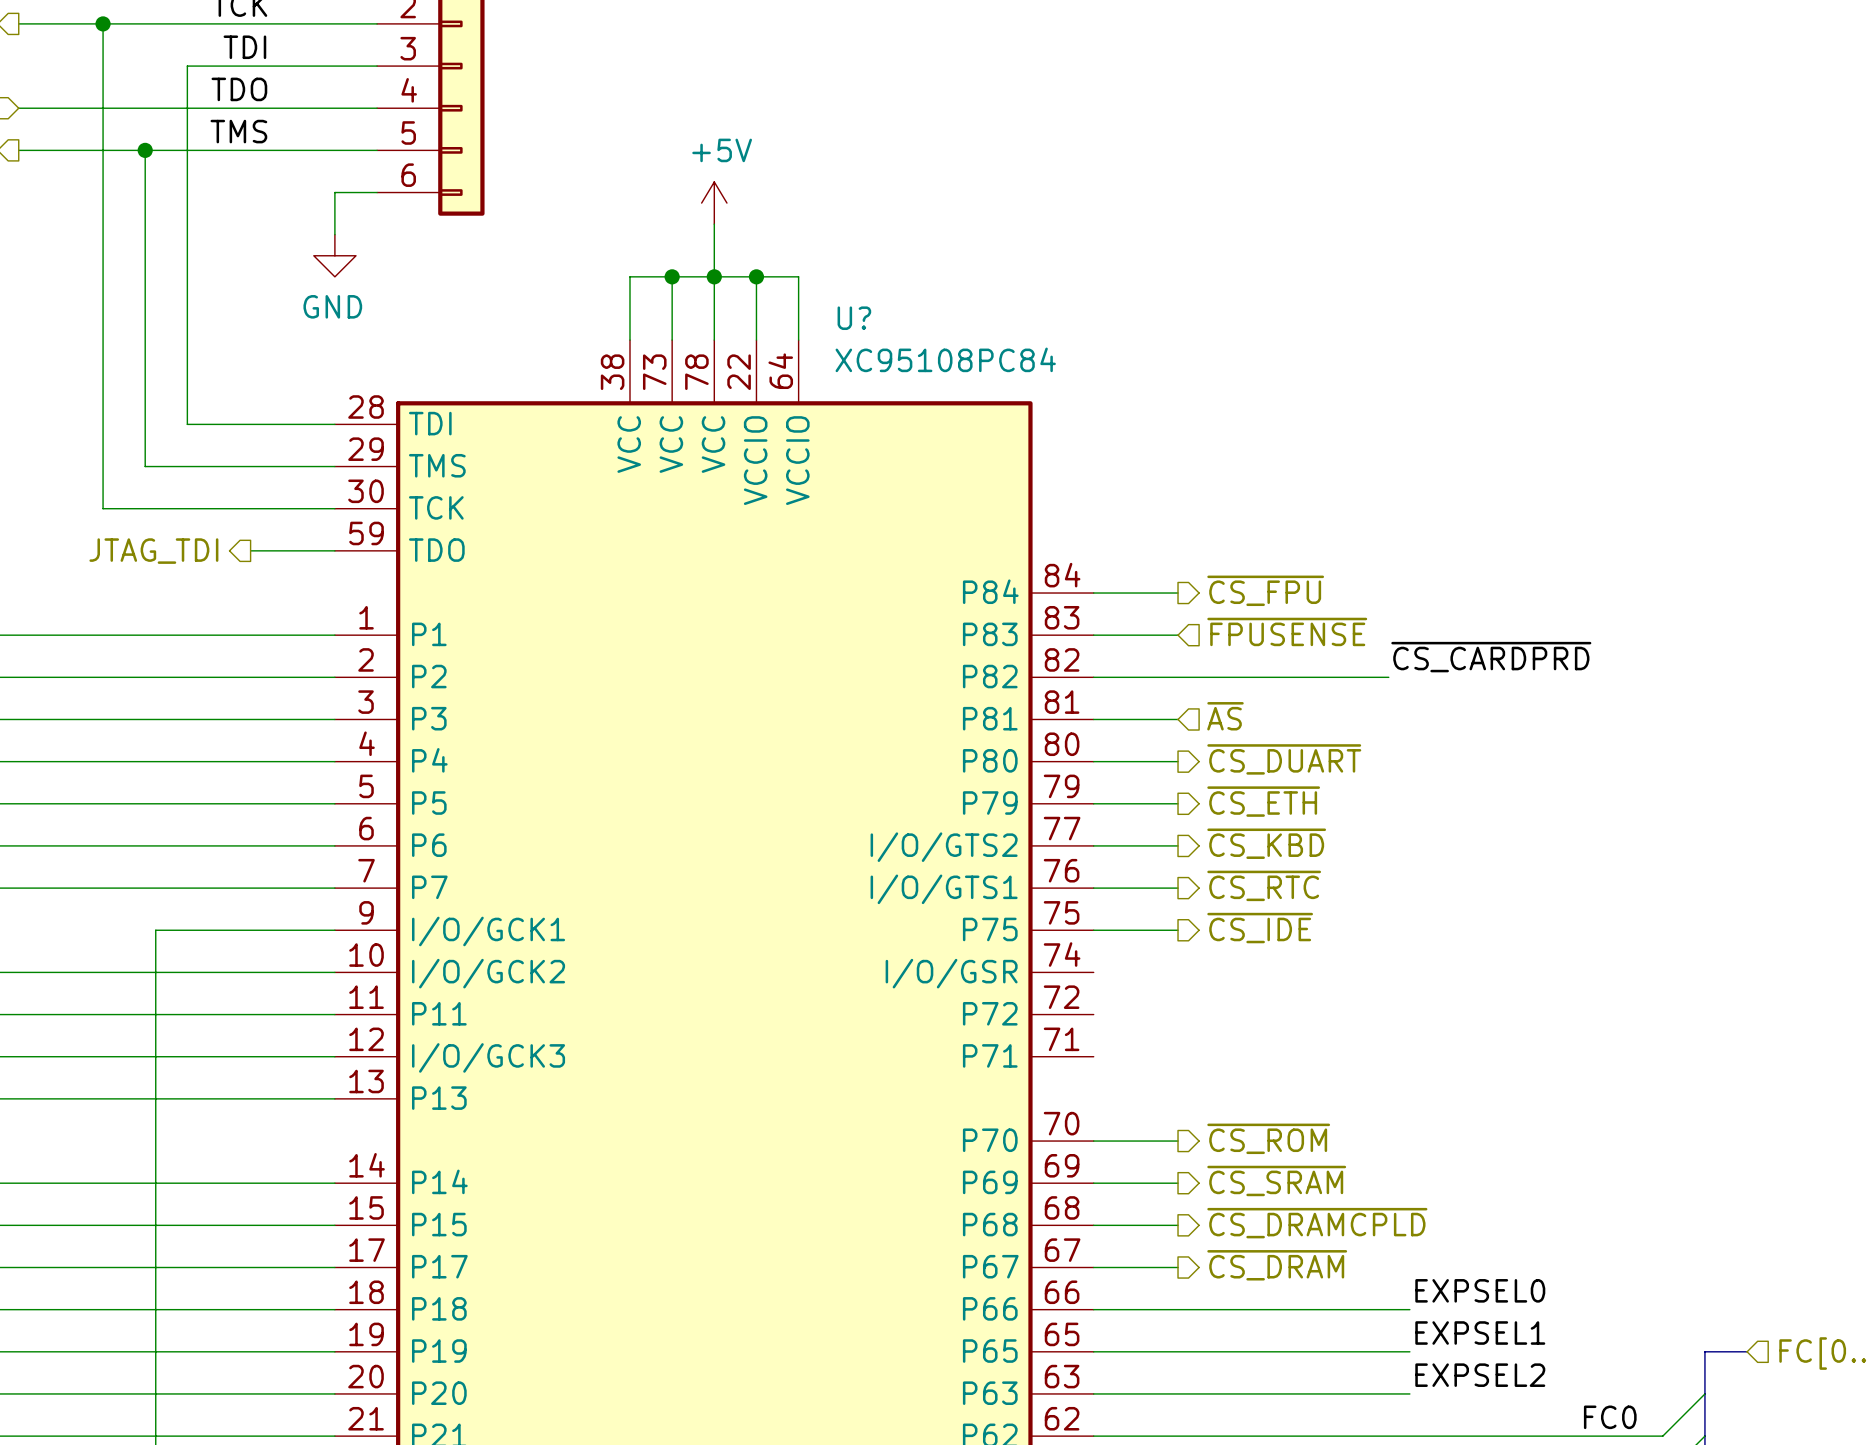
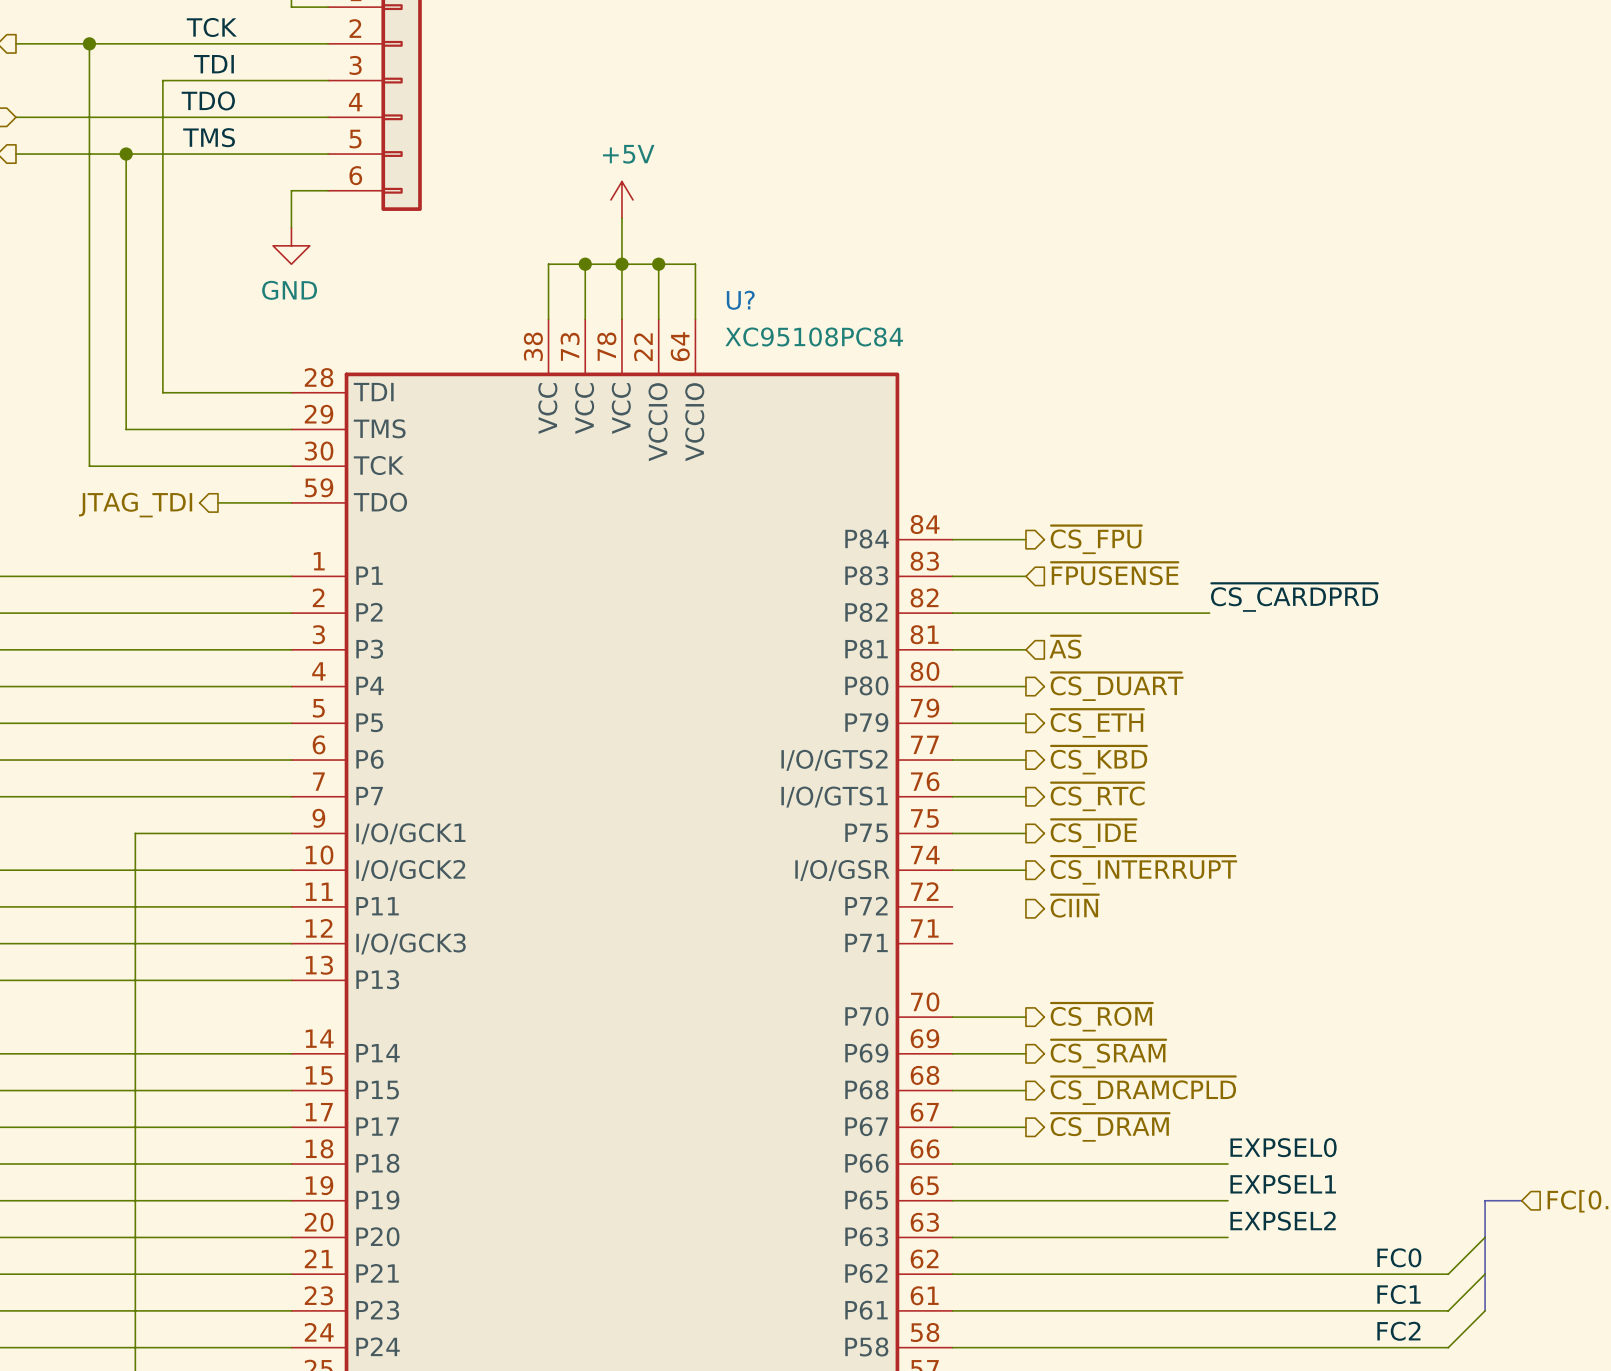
hierarchical label: none -> ~{CS_INTERRUPT} (1143, 870)
wire: none -> (952, 870) (1025, 870)
hierarchical label: none -> ~{CIIN} (1074, 906)

